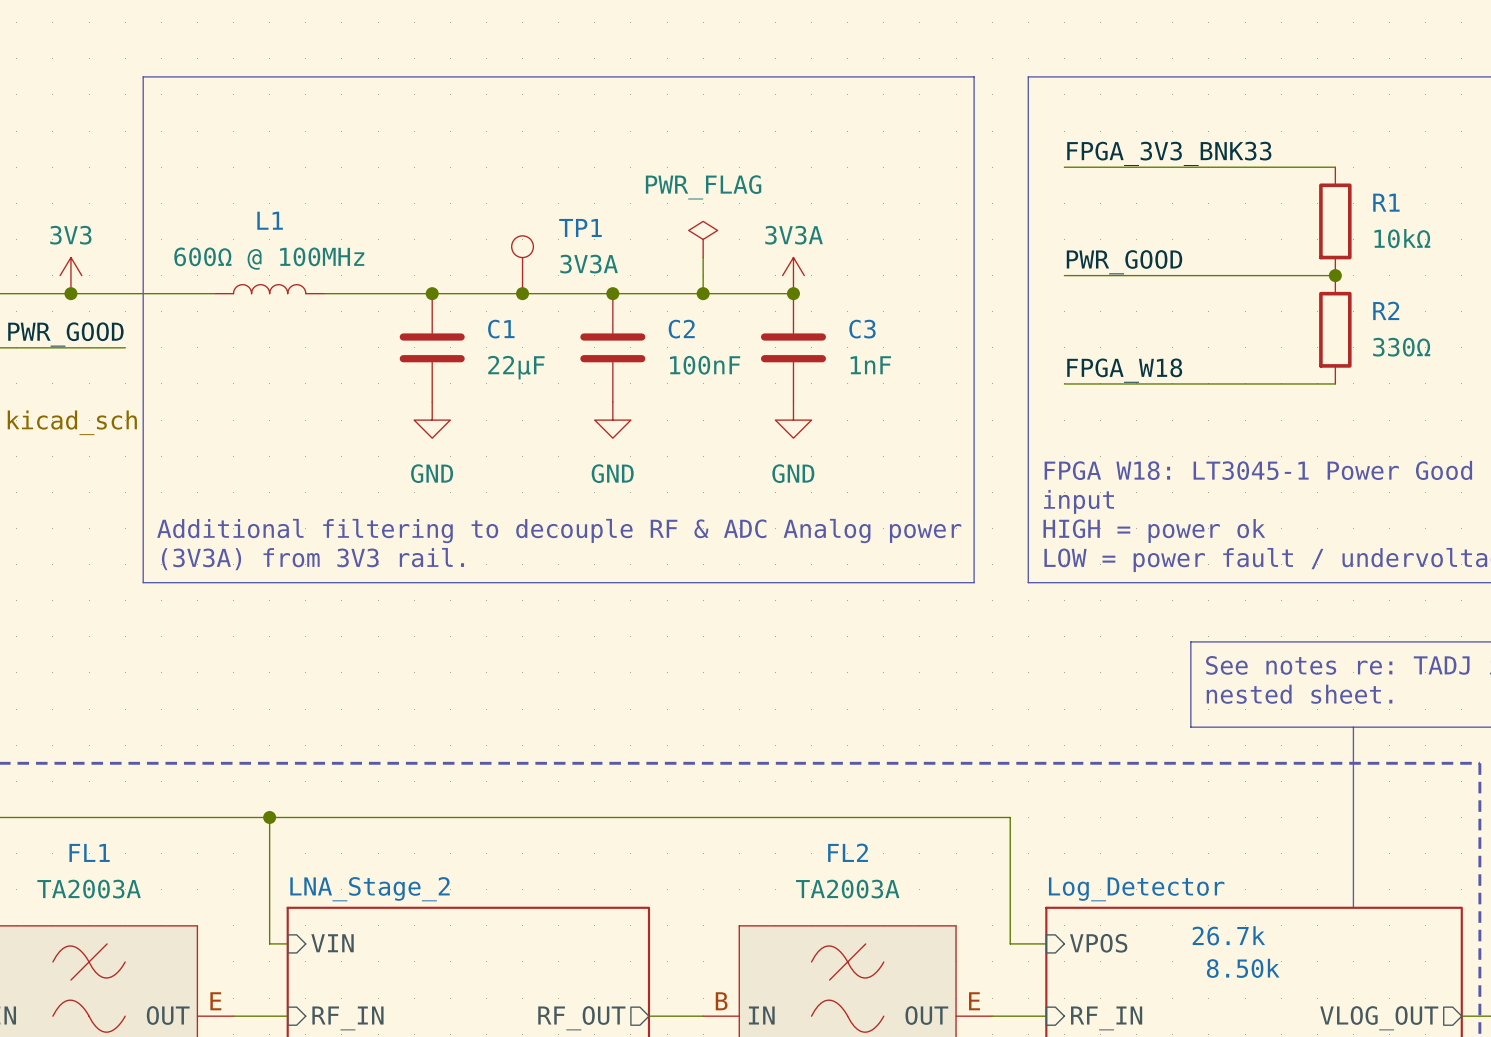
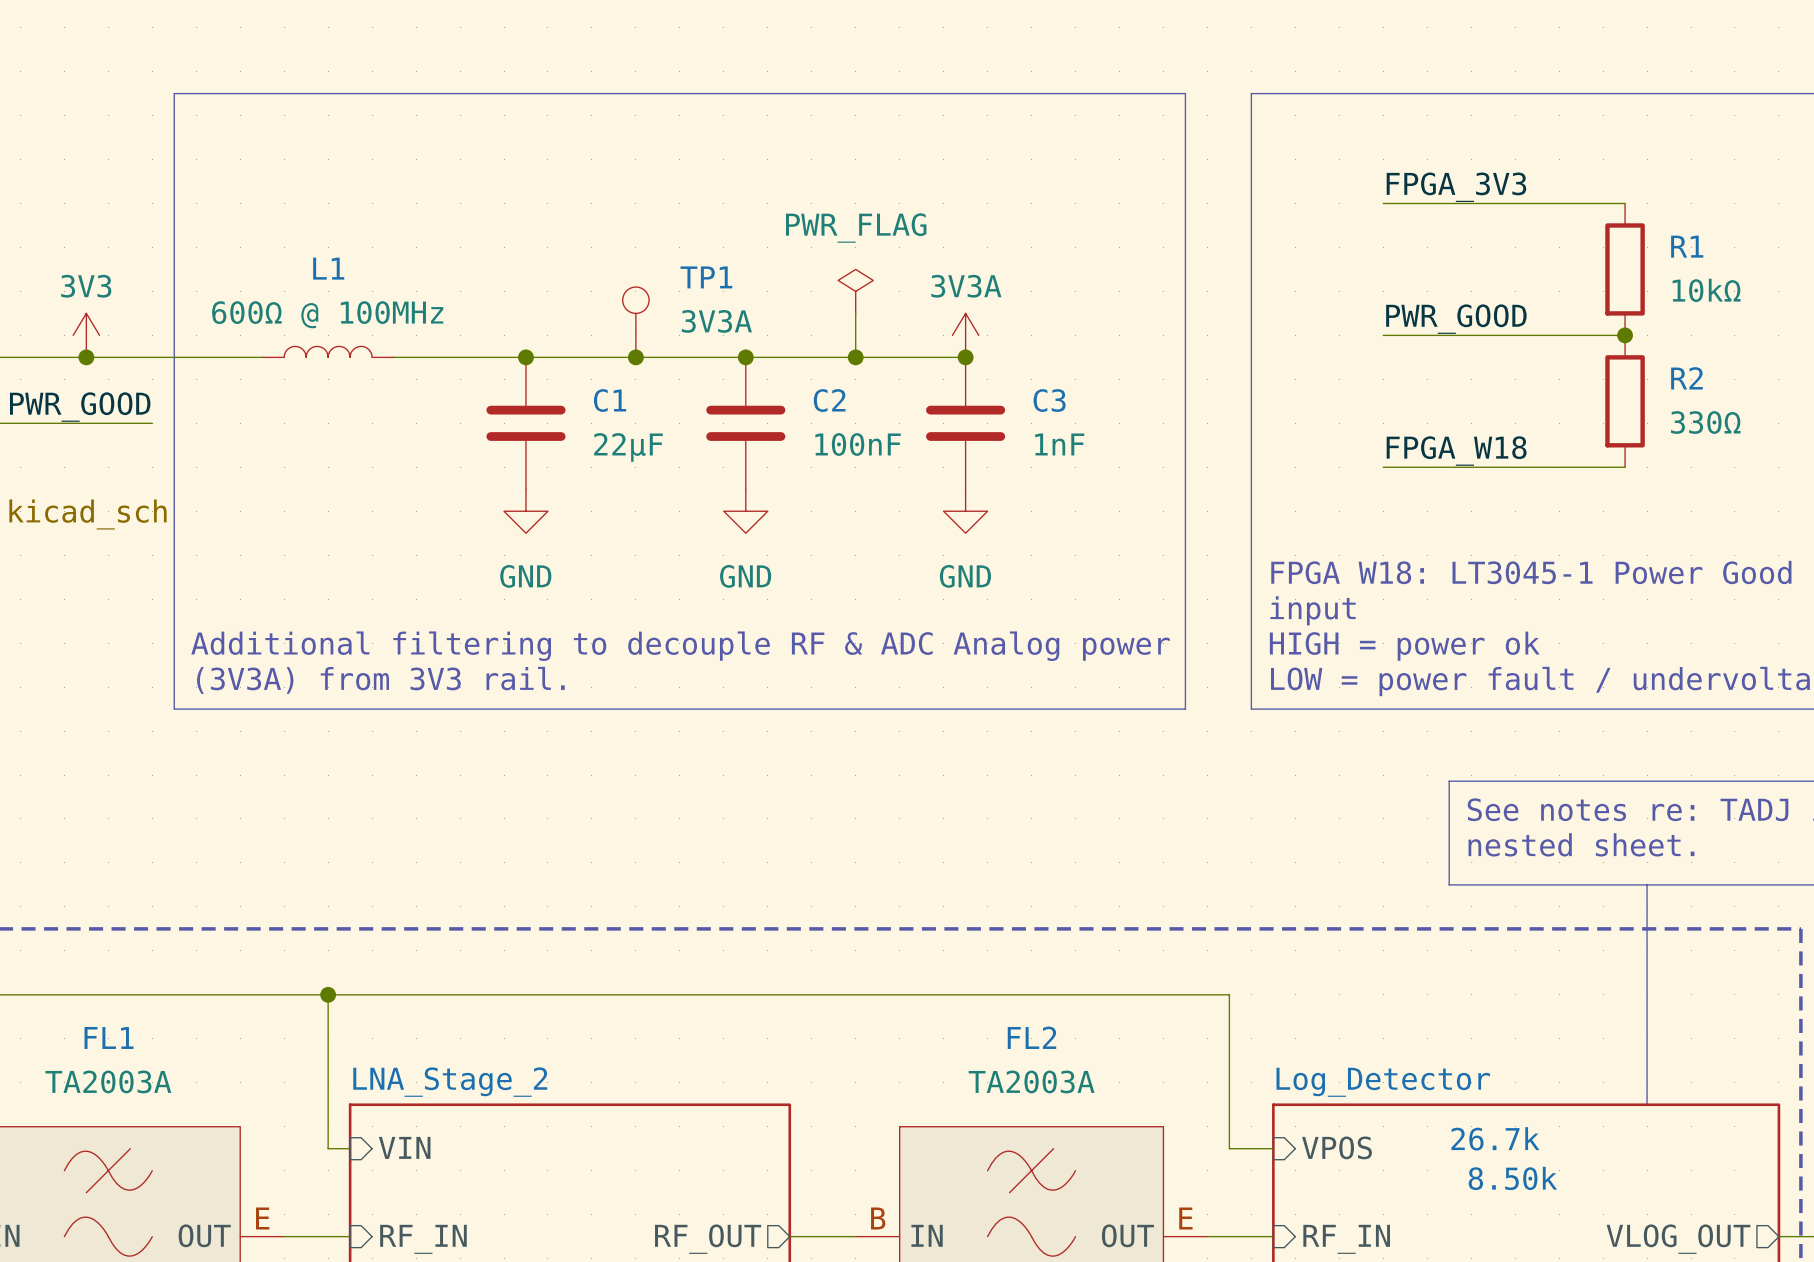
label: FPGA_3V3_BNK33 (1169, 153) -> FPGA_3V3 (1456, 187)
wire: (1064, 167) (1136, 167) -> none
label position: PWR_GOOD (1124, 262) -> PWR_GOOD (1456, 319)
wire: (1064, 275) (1136, 275) -> none
label position: FPGA_W18 (1124, 370) -> FPGA_W18 (1456, 451)
wire: (1064, 383) (1136, 383) -> none

